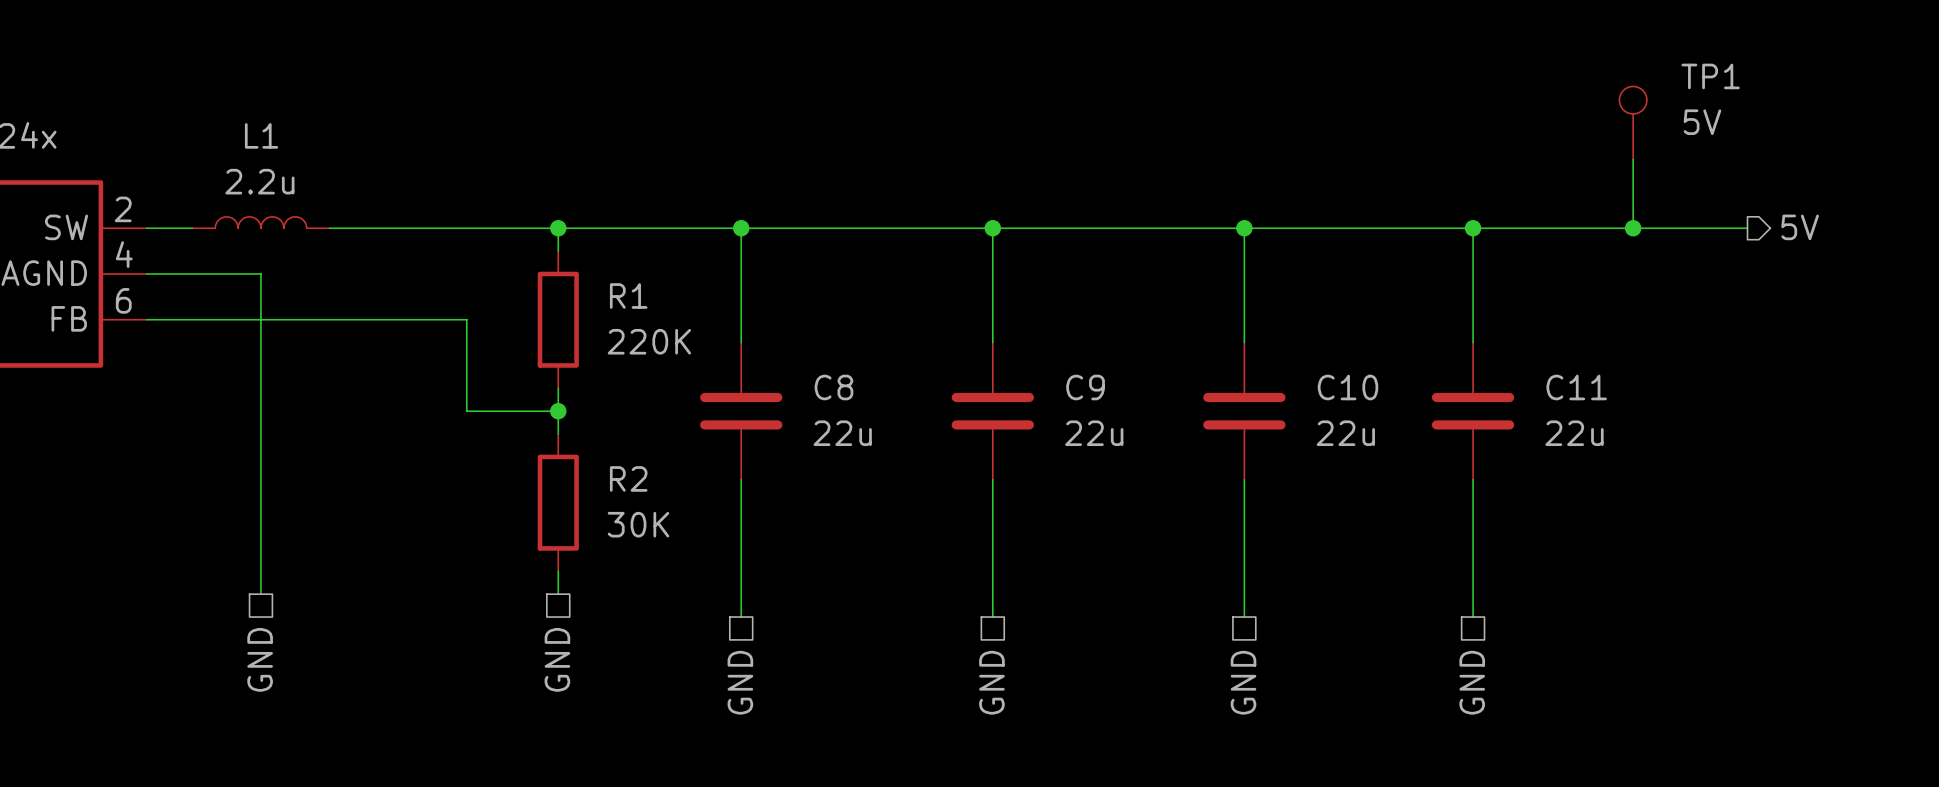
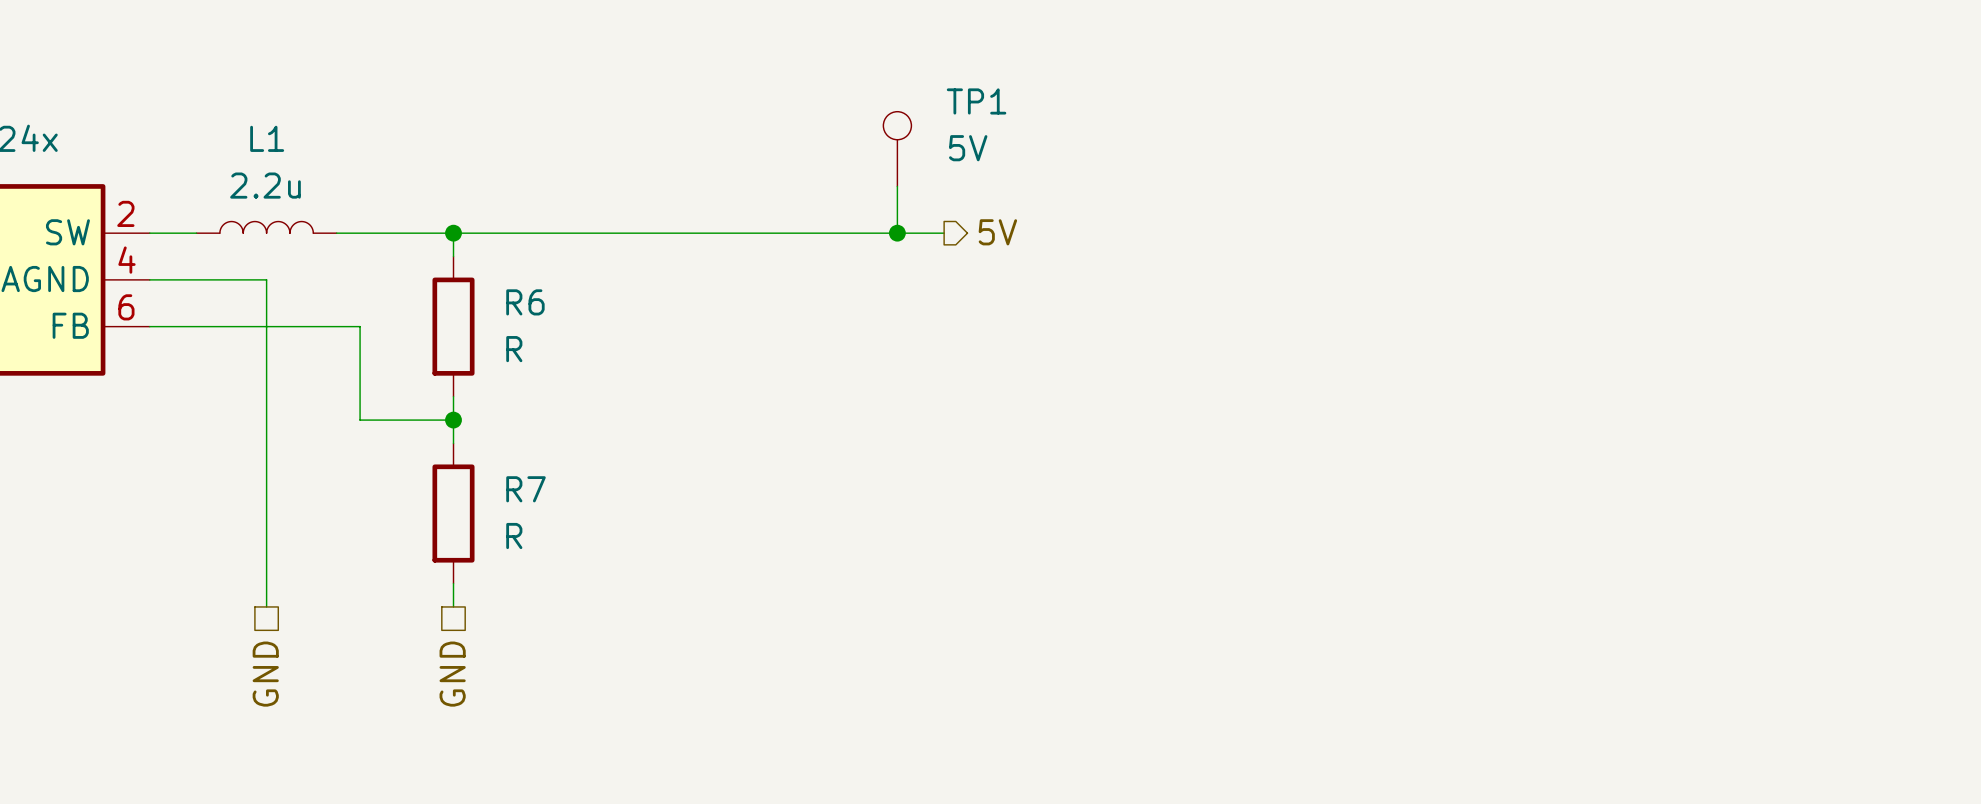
TP1 position: (1633, 123) -> (897, 149)
wire: (1633, 159) (1633, 228) -> none
wire: none -> (897, 186) (897, 233)
hierarchical label: none -> 5V (997, 232)
hierarchical label: 5V (1800, 227) -> none
junction: none -> (453, 233)
wire: (558, 228) (558, 251) -> (453, 233) (453, 256)
junction: (558, 228) -> none
wire: (741, 228) (741, 342) -> none
junction: (741, 228) -> none
junction: none -> (897, 233)
wire: (924, 228) (1747, 228) -> none
wire: (992, 228) (992, 342) -> none
junction: (992, 228) -> none
wire: (1244, 228) (1244, 342) -> none
junction: (1244, 228) -> none
wire: (1473, 228) (1473, 342) -> none
junction: (1473, 228) -> none
junction: (1633, 228) -> none
wire: (352, 319) (466, 319) (466, 411) (558, 411) -> (360, 326) (360, 420) (453, 420)
R6: none -> R (453, 326)
R1: 220K (558, 319) -> none
wire: (558, 388) (558, 434) -> (453, 396) (453, 443)
junction: none -> (453, 420)
junction: (558, 411) -> none
C8: 22u (741, 411) -> none
C9: 22u (992, 411) -> none
C10: 22u (1244, 411) -> none
C11: 22u (1473, 411) -> none
wire: (741, 479) (741, 617) -> none
wire: (992, 479) (992, 617) -> none
wire: (1244, 479) (1244, 617) -> none
wire: (1473, 479) (1473, 617) -> none
R7: none -> R (453, 513)
R2: 30K (558, 502) -> none
wire: (558, 571) (558, 594) -> (453, 583) (453, 606)
hierarchical label position: GND (557, 659) -> GND (452, 674)
hierarchical label: GND (740, 682) -> none
hierarchical label: GND (991, 682) -> none
hierarchical label: GND (1243, 682) -> none
hierarchical label: GND (1472, 682) -> none

